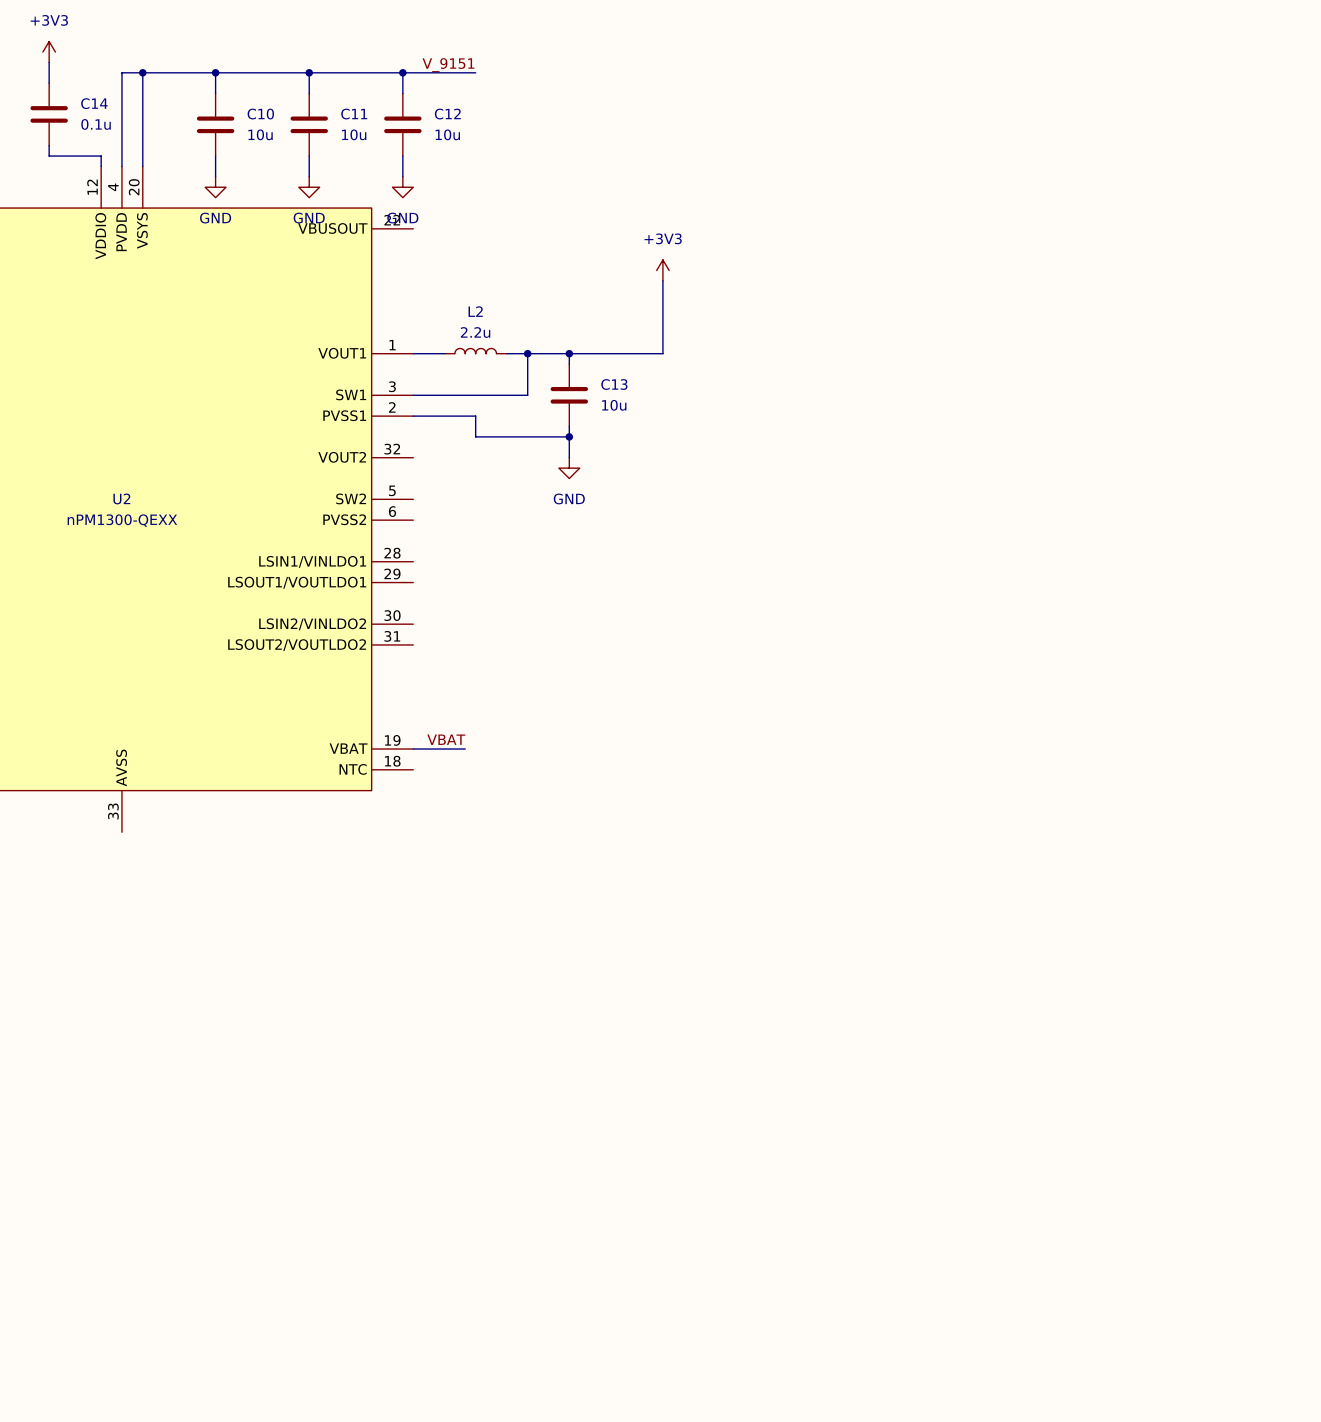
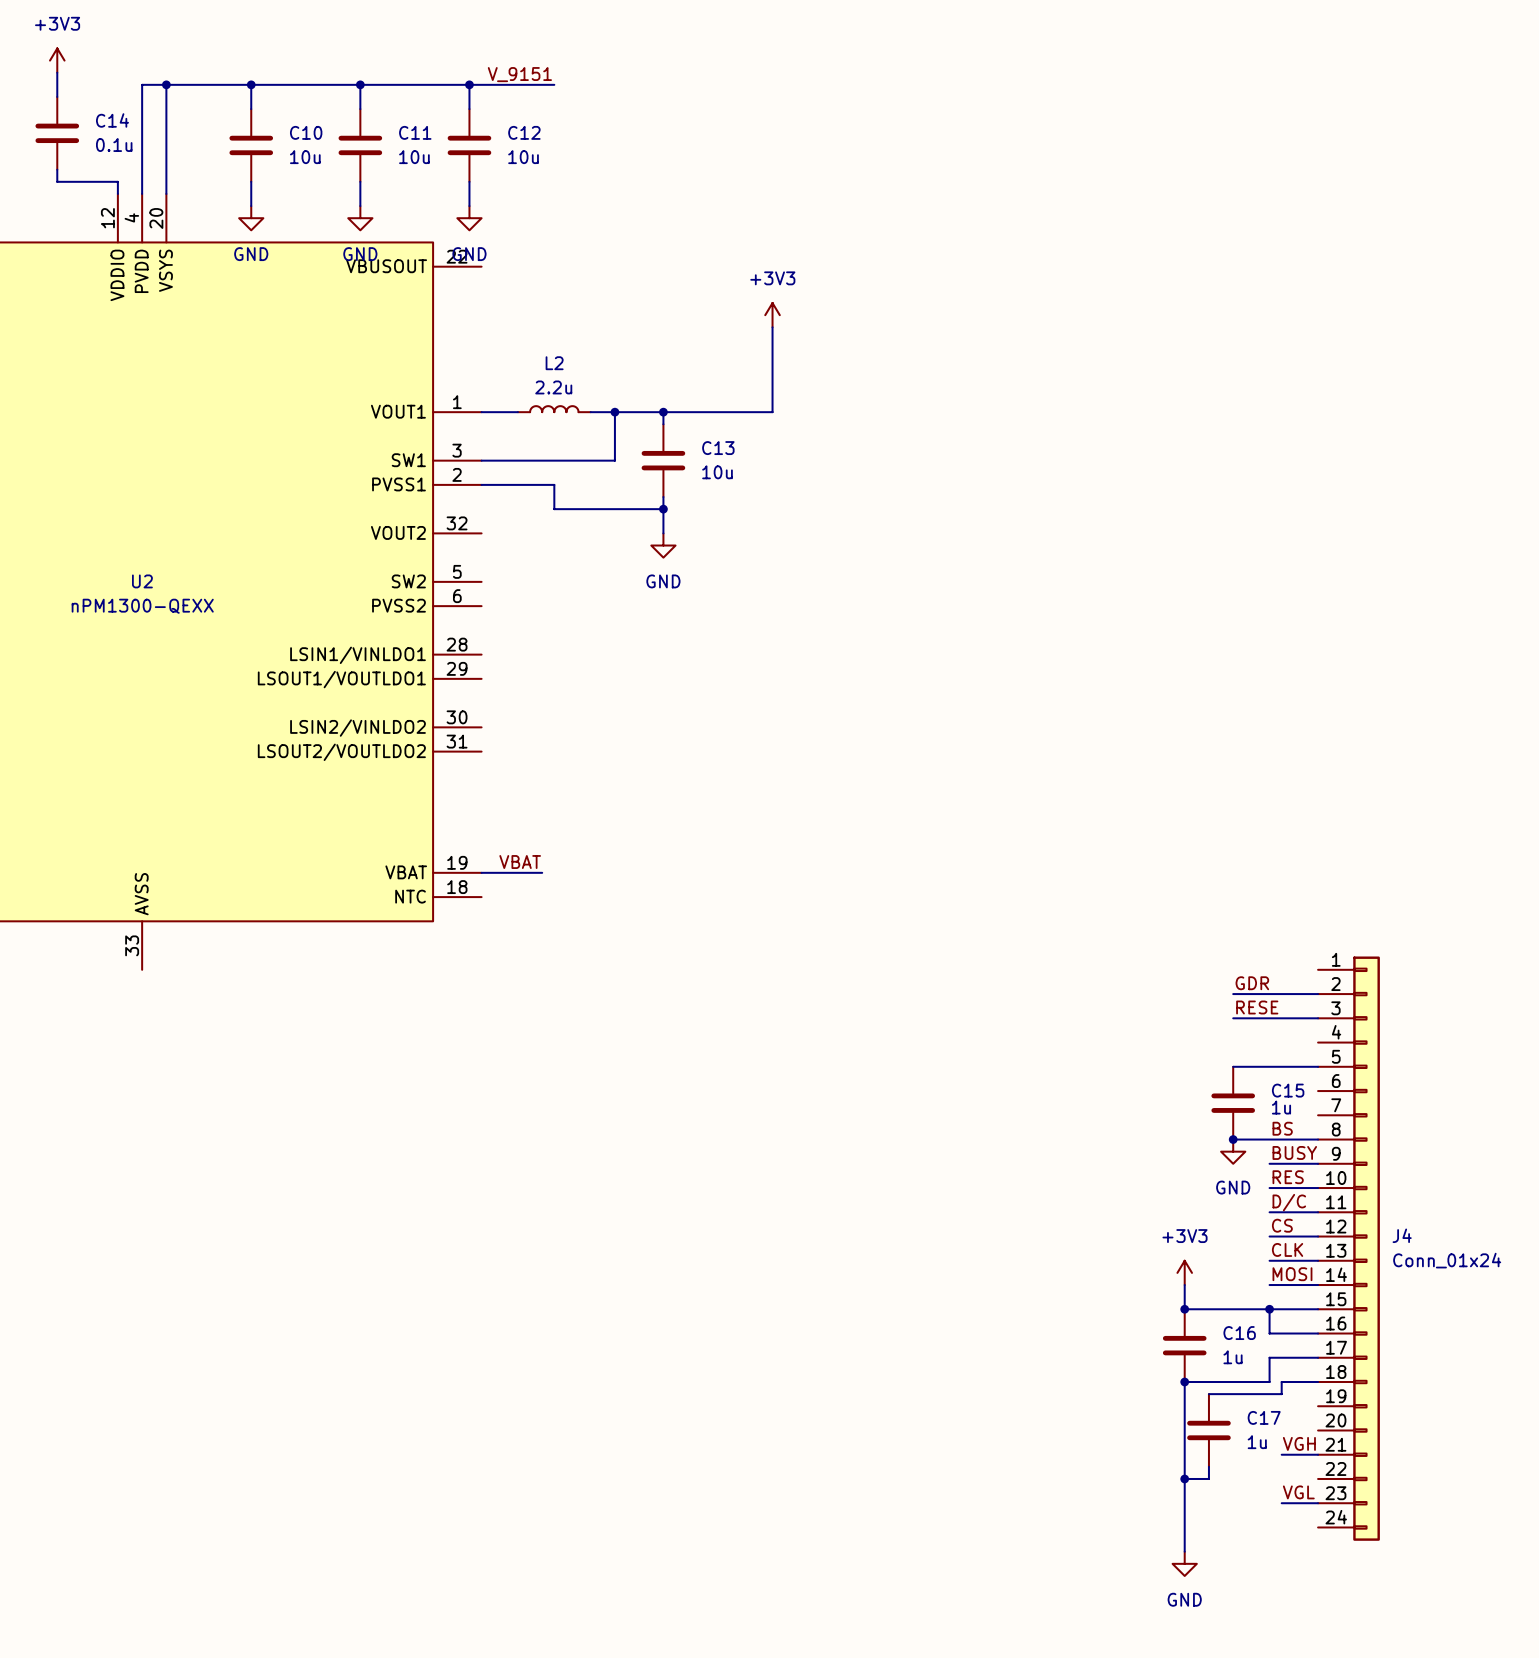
label: none -> GDR (1252, 983)
wire: none -> (1233, 994) (1318, 994)
label: none -> RESE (1257, 1007)
wire: none -> (1233, 1018) (1318, 1018)
wire: none -> (1233, 1066) (1318, 1066)
C15: none -> 1u (1233, 1103)
label: none -> BS (1282, 1128)
wire: none -> (1233, 1139) (1318, 1139)
junction: none -> (1233, 1139)
power symbol: none -> GND (1233, 1151)
label: none -> BUSY (1294, 1152)
wire: none -> (1269, 1163) (1318, 1163)
label: none -> RES (1288, 1177)
wire: none -> (1269, 1188) (1318, 1188)
label: none -> D/C (1289, 1202)
wire: none -> (1269, 1212) (1318, 1212)
label: none -> CS (1282, 1225)
wire: none -> (1269, 1236) (1318, 1236)
J4: none -> Conn_01x24 (1348, 1248)
label: none -> CLK (1287, 1249)
wire: none -> (1269, 1260) (1318, 1260)
power symbol: none -> +3V3 (1184, 1272)
label: none -> MOSI (1292, 1274)
wire: none -> (1184, 1285) (1184, 1309) (1318, 1309)
wire: none -> (1269, 1285) (1318, 1285)
junction: none -> (1184, 1309)
wire: none -> (1269, 1309) (1269, 1333) (1318, 1333)
junction: none -> (1269, 1309)
C16: none -> 1u (1184, 1345)
wire: none -> (1318, 1357) (1269, 1357) (1269, 1382) (1184, 1382) (1184, 1551)
junction: none -> (1184, 1382)
wire: none -> (1318, 1382) (1281, 1382) (1281, 1394) (1208, 1394)
C17: none -> 1u (1208, 1430)
label: none -> VGH (1299, 1443)
wire: none -> (1281, 1454) (1318, 1454)
wire: none -> (1208, 1466) (1208, 1478) (1184, 1478)
junction: none -> (1184, 1478)
label: none -> VGL (1298, 1492)
wire: none -> (1281, 1503) (1318, 1503)
power symbol: none -> GND (1184, 1563)

